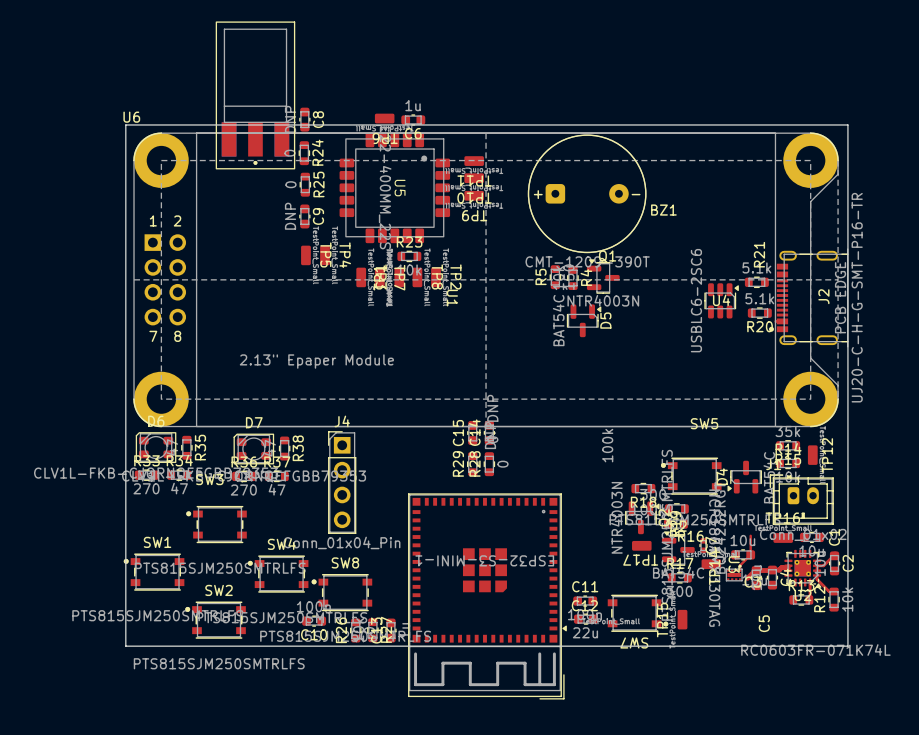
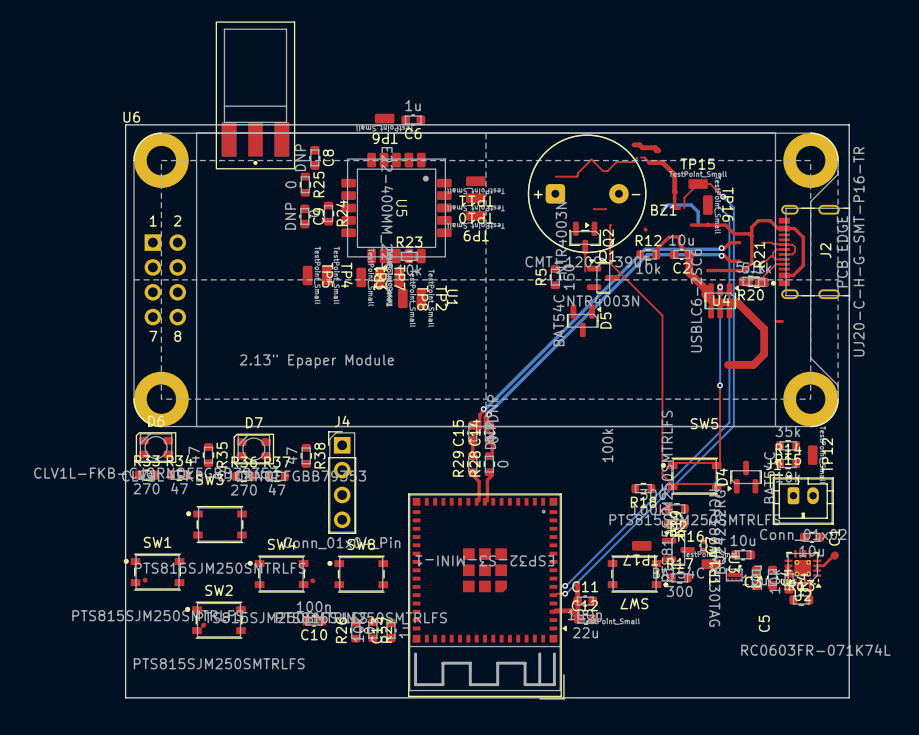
C8 position: (304, 119) -> (314, 157)
board edge: (125, 124) (847, 124) (847, 646) (125, 646) (125, 124) -> (125, 124) (125, 697) (849, 697) (849, 124) (125, 124)
top track: none -> (634, 144) (639, 144) (642, 147) (655, 147) (658, 150) (656, 150)
R24 position: (304, 153) -> (328, 213)
top track: none -> (637, 157) (633, 162) (616, 162) (607, 171) (603, 171) (591, 159) (576, 176) (555, 176)
top track: none -> (640, 157) (644, 157) (649, 162) (662, 162) (674, 174) (674, 208) (679, 208)
TP11 position: (474, 161) -> (475, 181)
TP10 position: (474, 178) -> (475, 198)
U5 position: (394, 187) -> (396, 208)
TP9 position: (474, 195) -> (475, 215)
top track: none -> (723, 196) (710, 184) (698, 184) (684, 197) (684, 208)
bottom track: none -> (723, 196) (733, 207) (733, 426) (565, 593)
via: none -> (723, 196)
bottom track: none -> (717, 205) (729, 217) (729, 422) (565, 585)
top track: none -> (594, 208) (605, 208)
bottom track: none -> (662, 210) (667, 205) (691, 205) (698, 211) (698, 225)
top track: none -> (611, 225) (610, 263) (662, 315) (662, 474) (671, 483) (720, 483)
top track: none -> (691, 225) (725, 225) (734, 233) (749, 233) (751, 236)
top track: none -> (645, 229) (645, 229)
top track: none -> (669, 236) (656, 249) (656, 254)
top track: none -> (674, 236) (679, 236) (679, 244) (689, 254)
top track: none -> (739, 242) (729, 242) (723, 249) (721, 248)
top track: none -> (761, 242) (792, 244) (794, 247) (794, 251) (792, 254) (784, 254)
top track: none -> (585, 247) (585, 271)
bottom track: none -> (721, 248) (645, 249) (483, 409)
via: none -> (721, 248)
top track: none -> (784, 249) (776, 249) (772, 252) (775, 259) (784, 259)
top track: none -> (689, 254) (689, 272) (705, 289)
TP5 position: (305, 255) -> (307, 275)
TP4 position: (325, 255) -> (326, 275)
top track: none -> (721, 255) (723, 254) (729, 261) (739, 261)
bottom track: none -> (721, 255) (647, 254) (489, 414)
via: none -> (721, 255)
top track: none -> (772, 256) (766, 261) (761, 261)
top track: none -> (784, 264) (776, 264) (758, 281)
top track: none -> (707, 270) (744, 270) (751, 262) (751, 227) (758, 220) (770, 220) (778, 228) (794, 228) (803, 237) (803, 265) (793, 275) (784, 275)
TP8 position: (417, 277) -> (402, 298)
TP2 position: (436, 277) -> (421, 298)
R4 position: (572, 278) -> (789, 581)
bottom track: none -> (720, 287) (720, 385)
via: none -> (720, 287)
top track: none -> (705, 289) (705, 295) (712, 302) (737, 302) (764, 329) (764, 354) (753, 364) (727, 364)
J2 position: (808, 297) -> (810, 251)
R20 position: (759, 313) -> (750, 281)
top track: none -> (720, 385) (720, 462) (676, 462)
via: none -> (720, 385)
top track: none -> (483, 409) (479, 414) (479, 428) (472, 435) (472, 459)
via: none -> (483, 409)
top track: none -> (489, 414) (485, 416) (485, 428) (492, 435) (492, 459)
via: none -> (489, 414)
R35 position: (186, 447) -> (208, 455)
R38 position: (284, 448) -> (306, 455)
top track: none -> (472, 475) (479, 481) (479, 500)
top track: none -> (492, 475) (487, 480) (487, 500)
Q2 footprint: [625, 501, 660, 535] -> [569, 221, 602, 255]
top track: (750, 535) (750, 554) (740, 565) (740, 570) -> none
TP16 rotation: 0° (783, 538) -> 90° clockwise (707, 205)
TP16 position: (783, 538) -> (707, 205)
C2 rotation: 0° (834, 563) -> 90° clockwise (681, 254)
C2 position: (834, 563) -> (681, 254)
top track: (787, 567) (781, 567) (779, 570) (755, 570) (747, 578) -> none
top track: (817, 575) (817, 579) (829, 591) (834, 591) -> none
top track: none -> (144, 580) (145, 580)
top track: none -> (577, 583) (577, 618) (570, 610) (555, 610)
via: none -> (565, 585)
SW8 position: (341, 592) -> (357, 574)
top track: none -> (565, 593) (555, 594)
via: none -> (565, 593)
R12 rotation: 0° (834, 599) -> 90° clockwise (648, 254)
R12 position: (834, 599) -> (648, 254)
SW7 position: (638, 613) -> (638, 574)
TP15 rotation: 0° (682, 619) -> 90° clockwise (698, 184)
TP15 position: (682, 619) -> (698, 184)
top track: none -> (203, 625) (203, 625)

